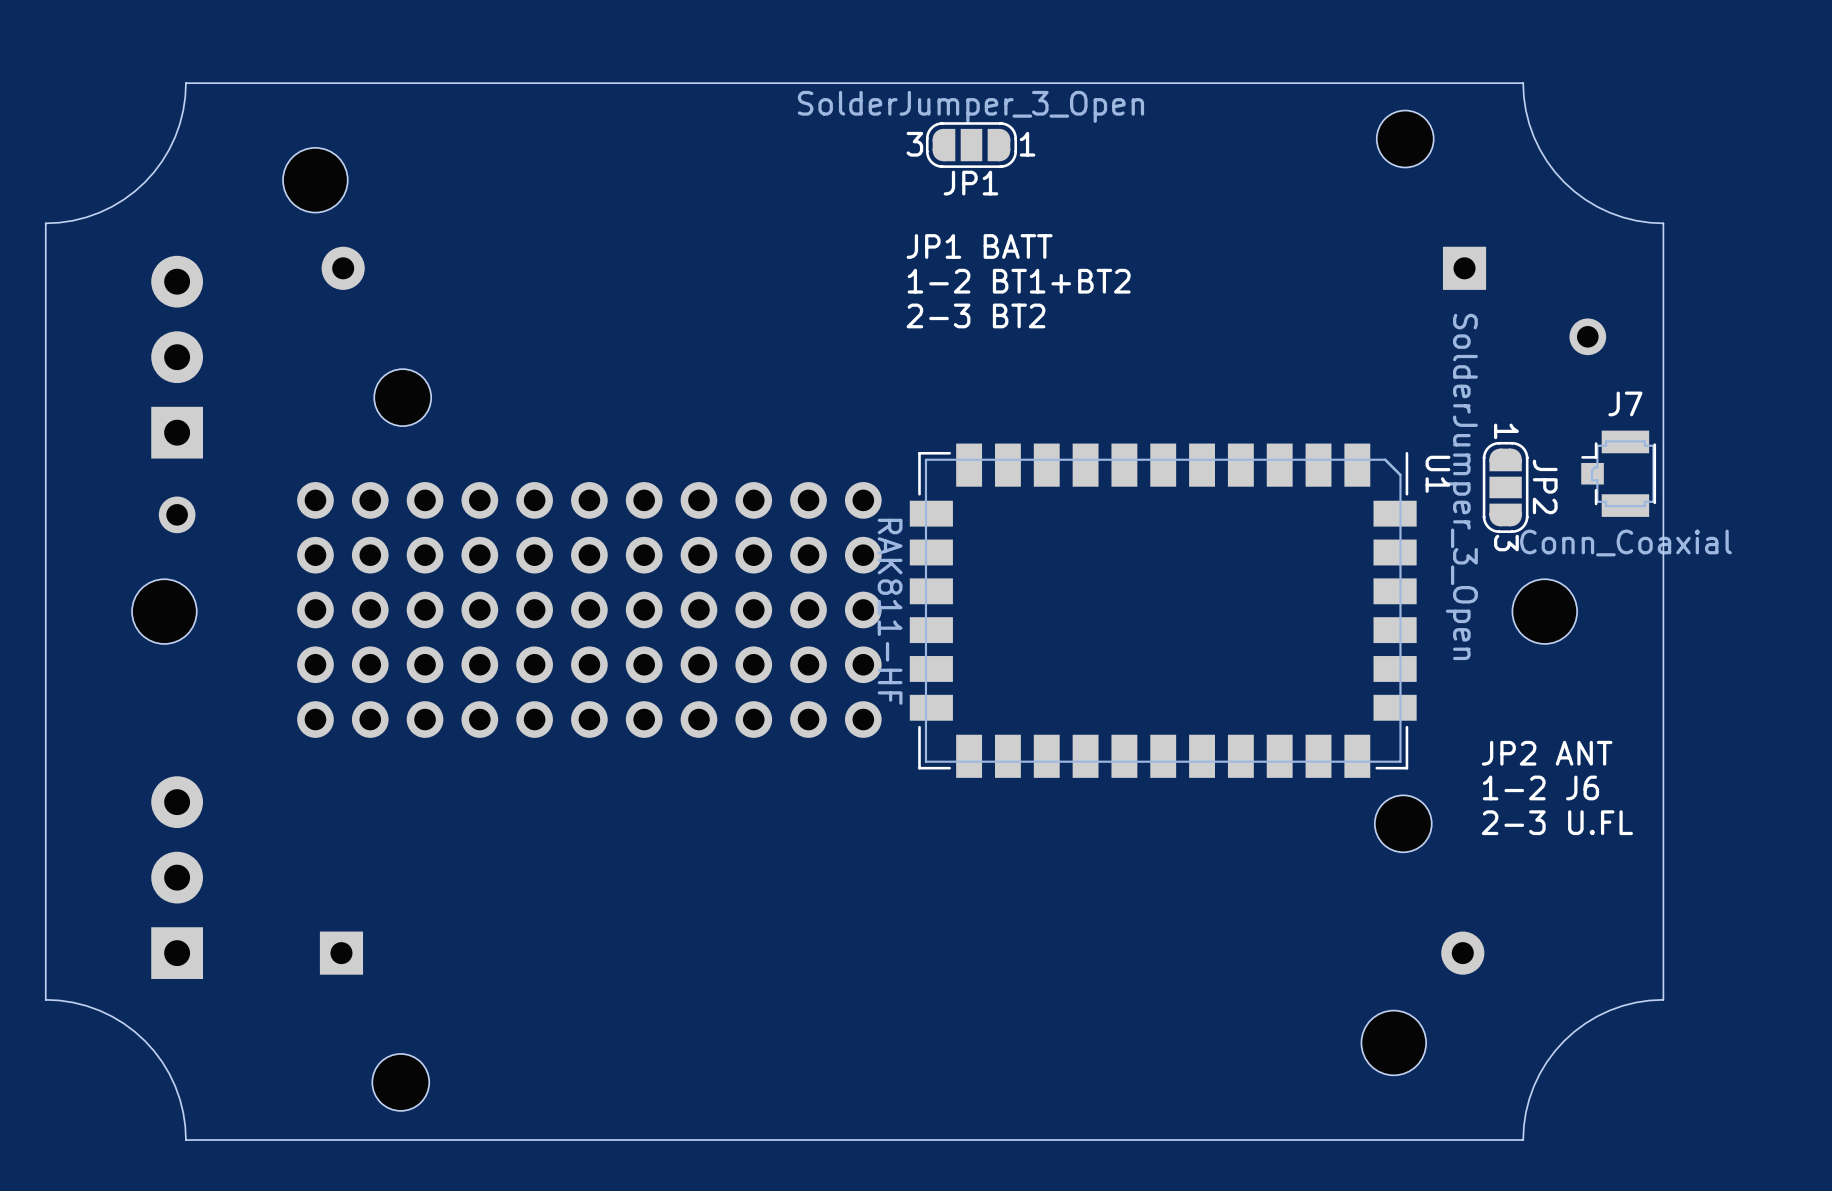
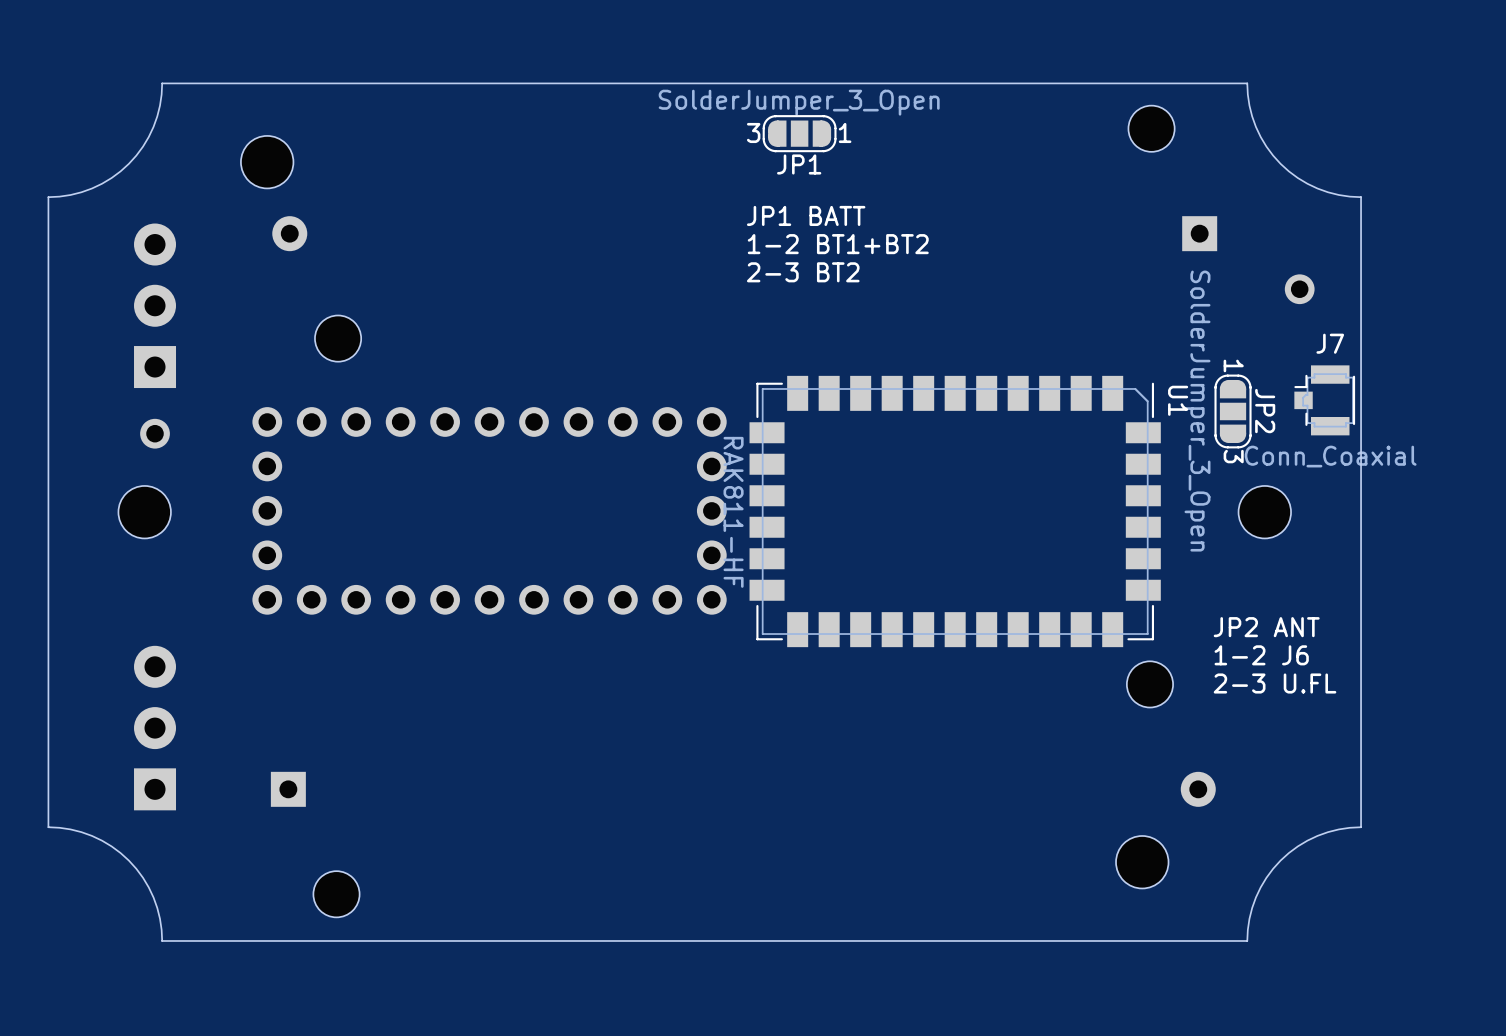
part: (589, 555) -> none
part: (589, 609) -> none
part: (589, 664) -> none

